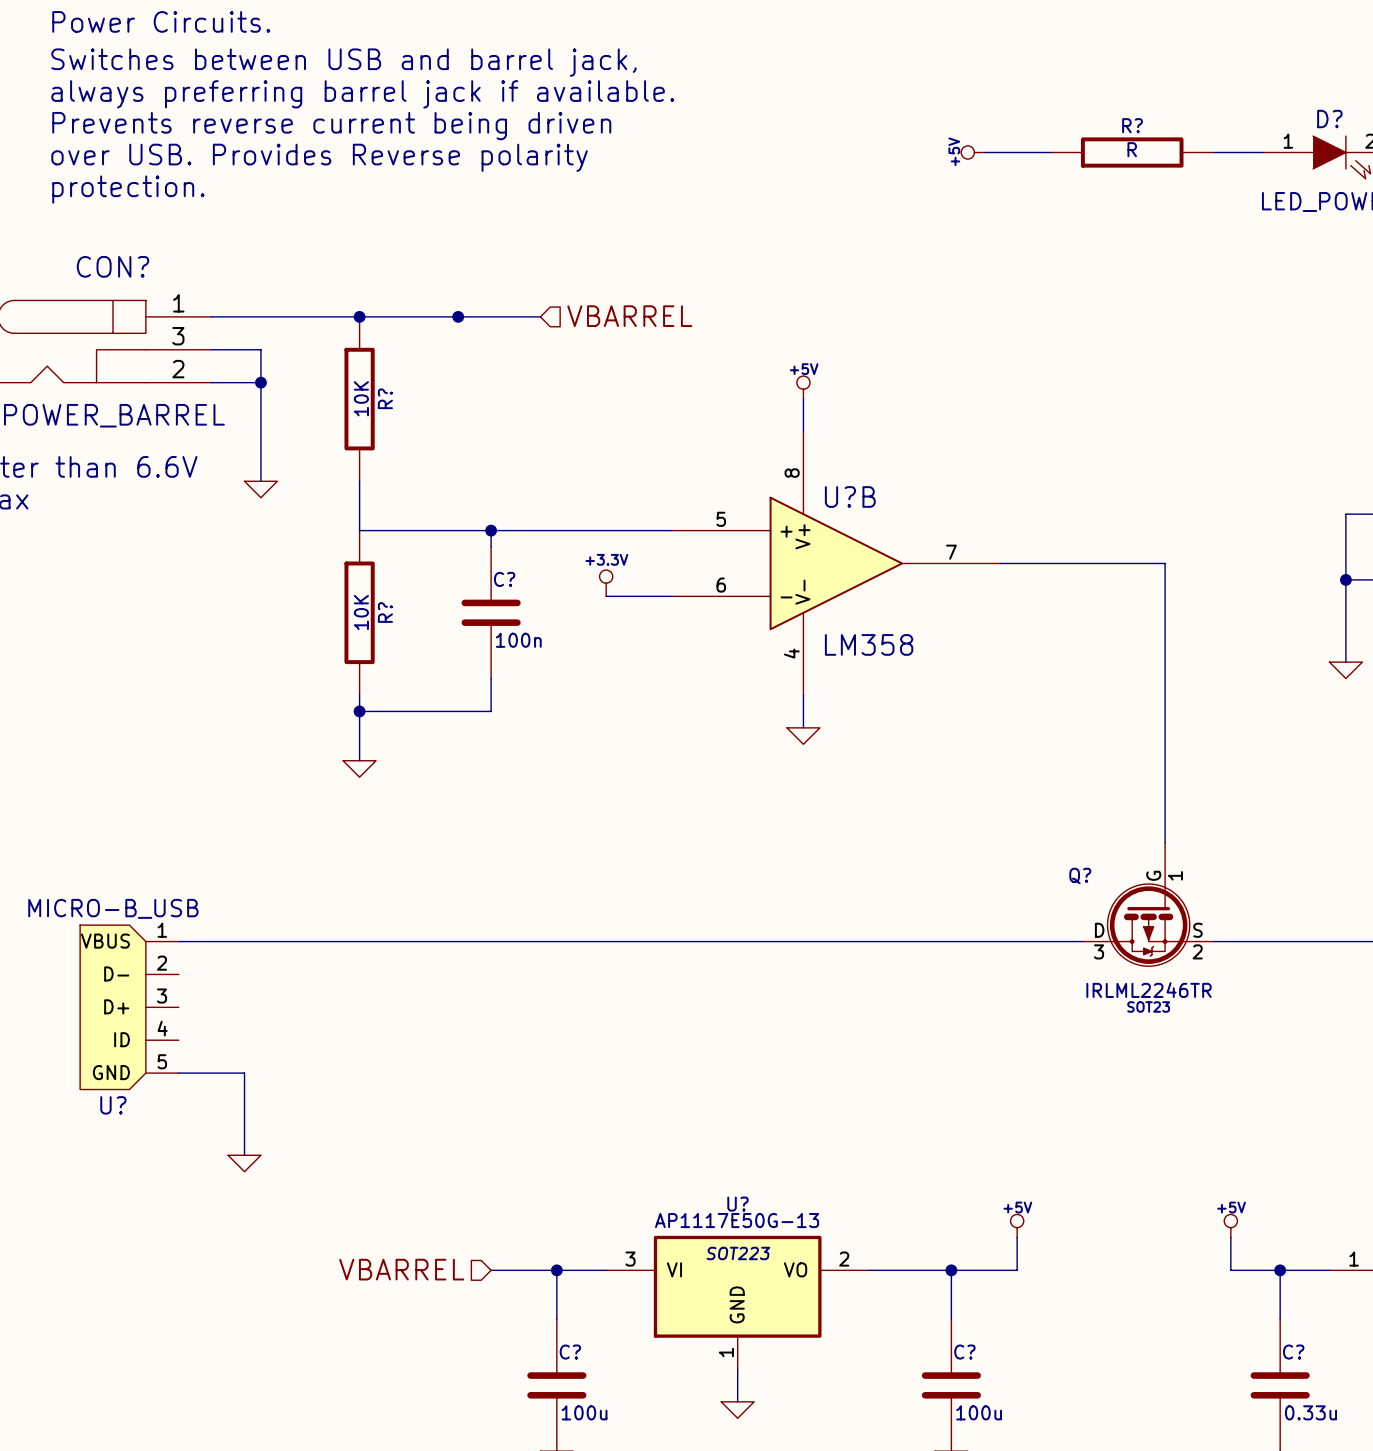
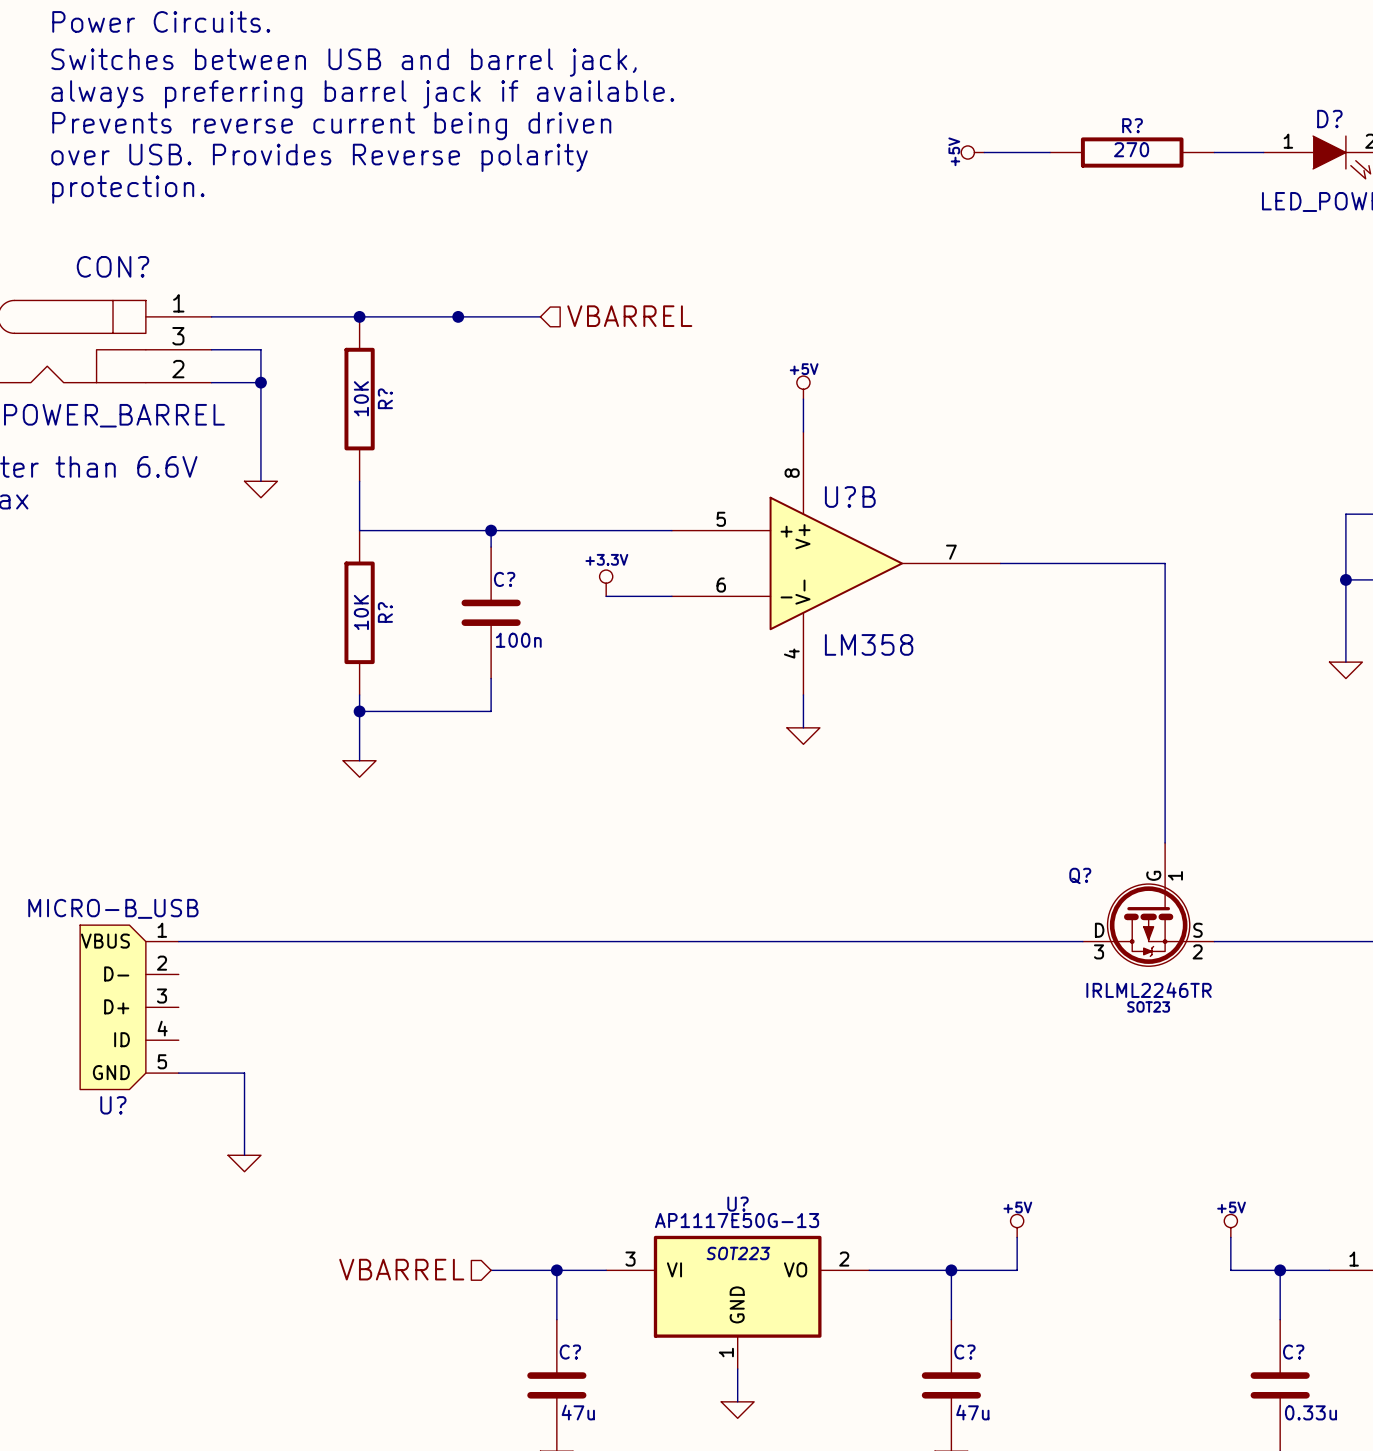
R? value: R (1132, 149) -> 270 (1131, 149)
C? value: 100u (584, 1412) -> 47u (578, 1412)
C? value: 100u (979, 1412) -> 47u (972, 1412)

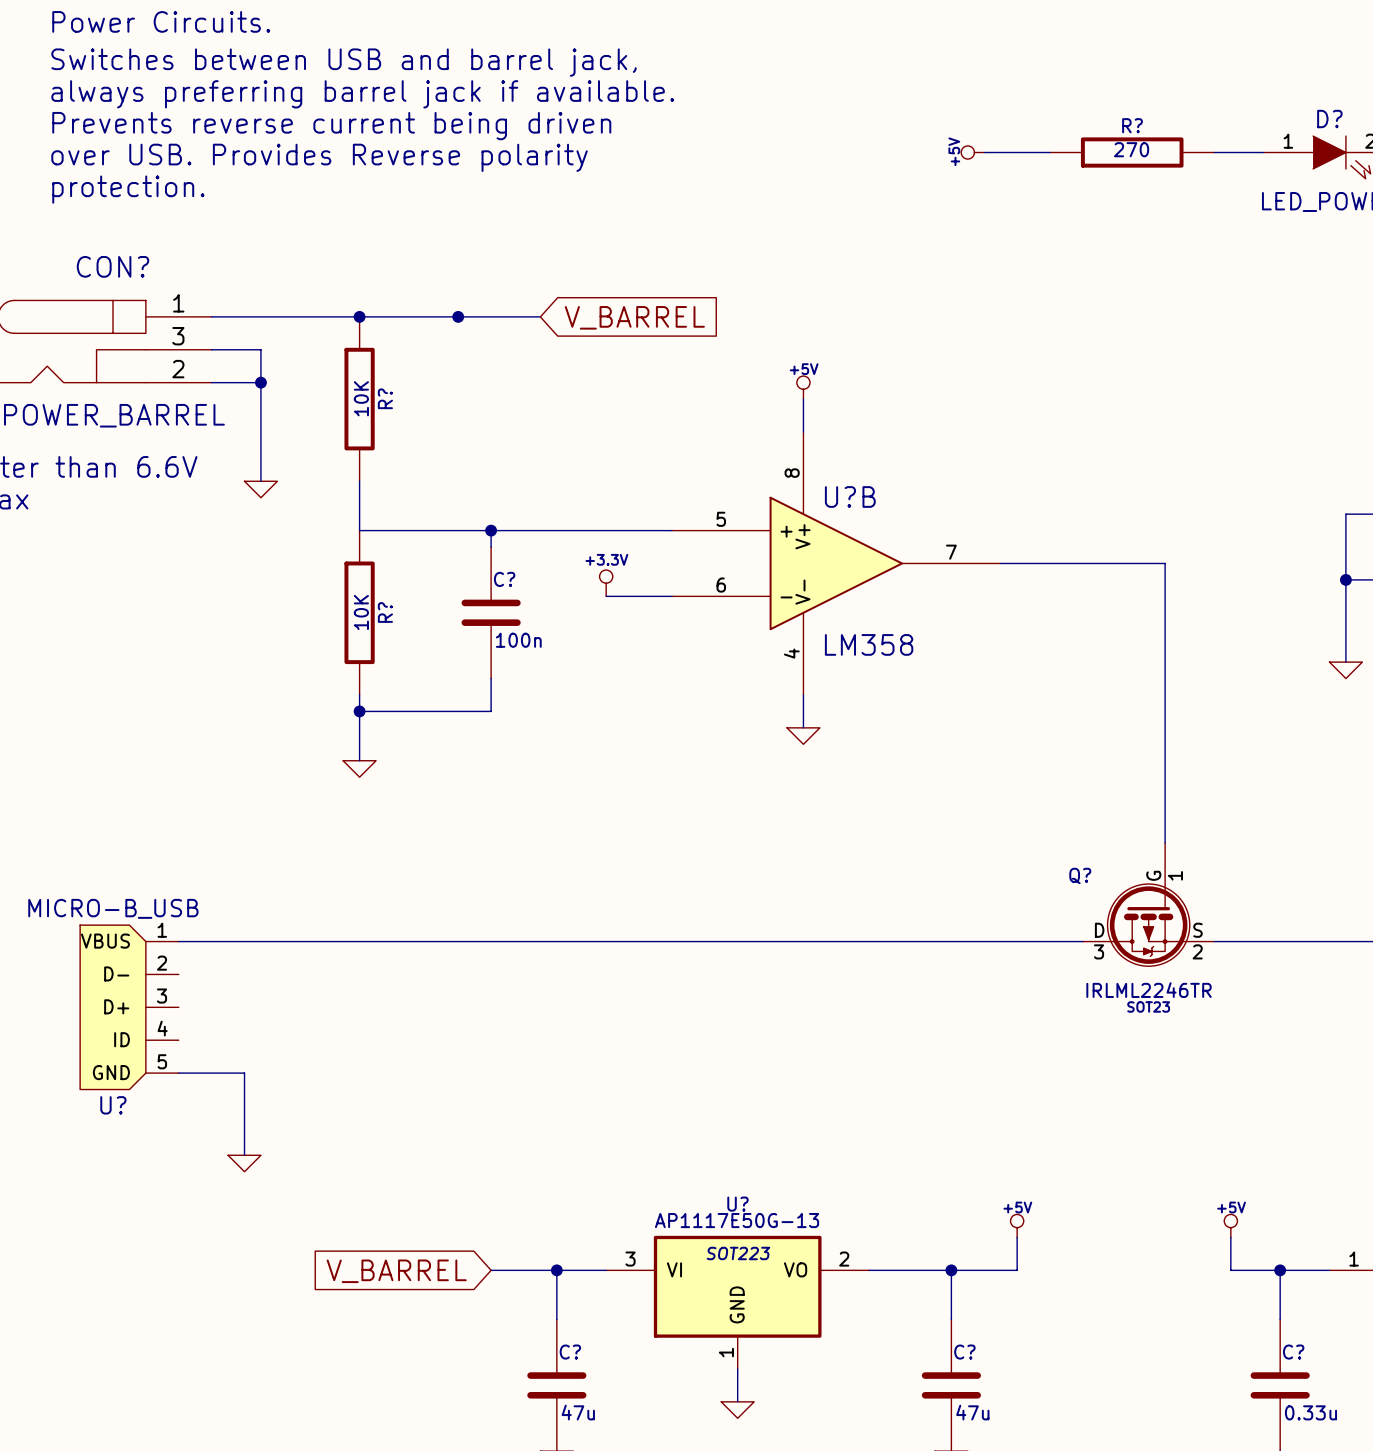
hierarchical label: VBARREL (629, 316) -> none
global label: none -> V_BARREL (634, 317)
hierarchical label: VBARREL (401, 1269) -> none
global label: none -> V_BARREL (396, 1271)

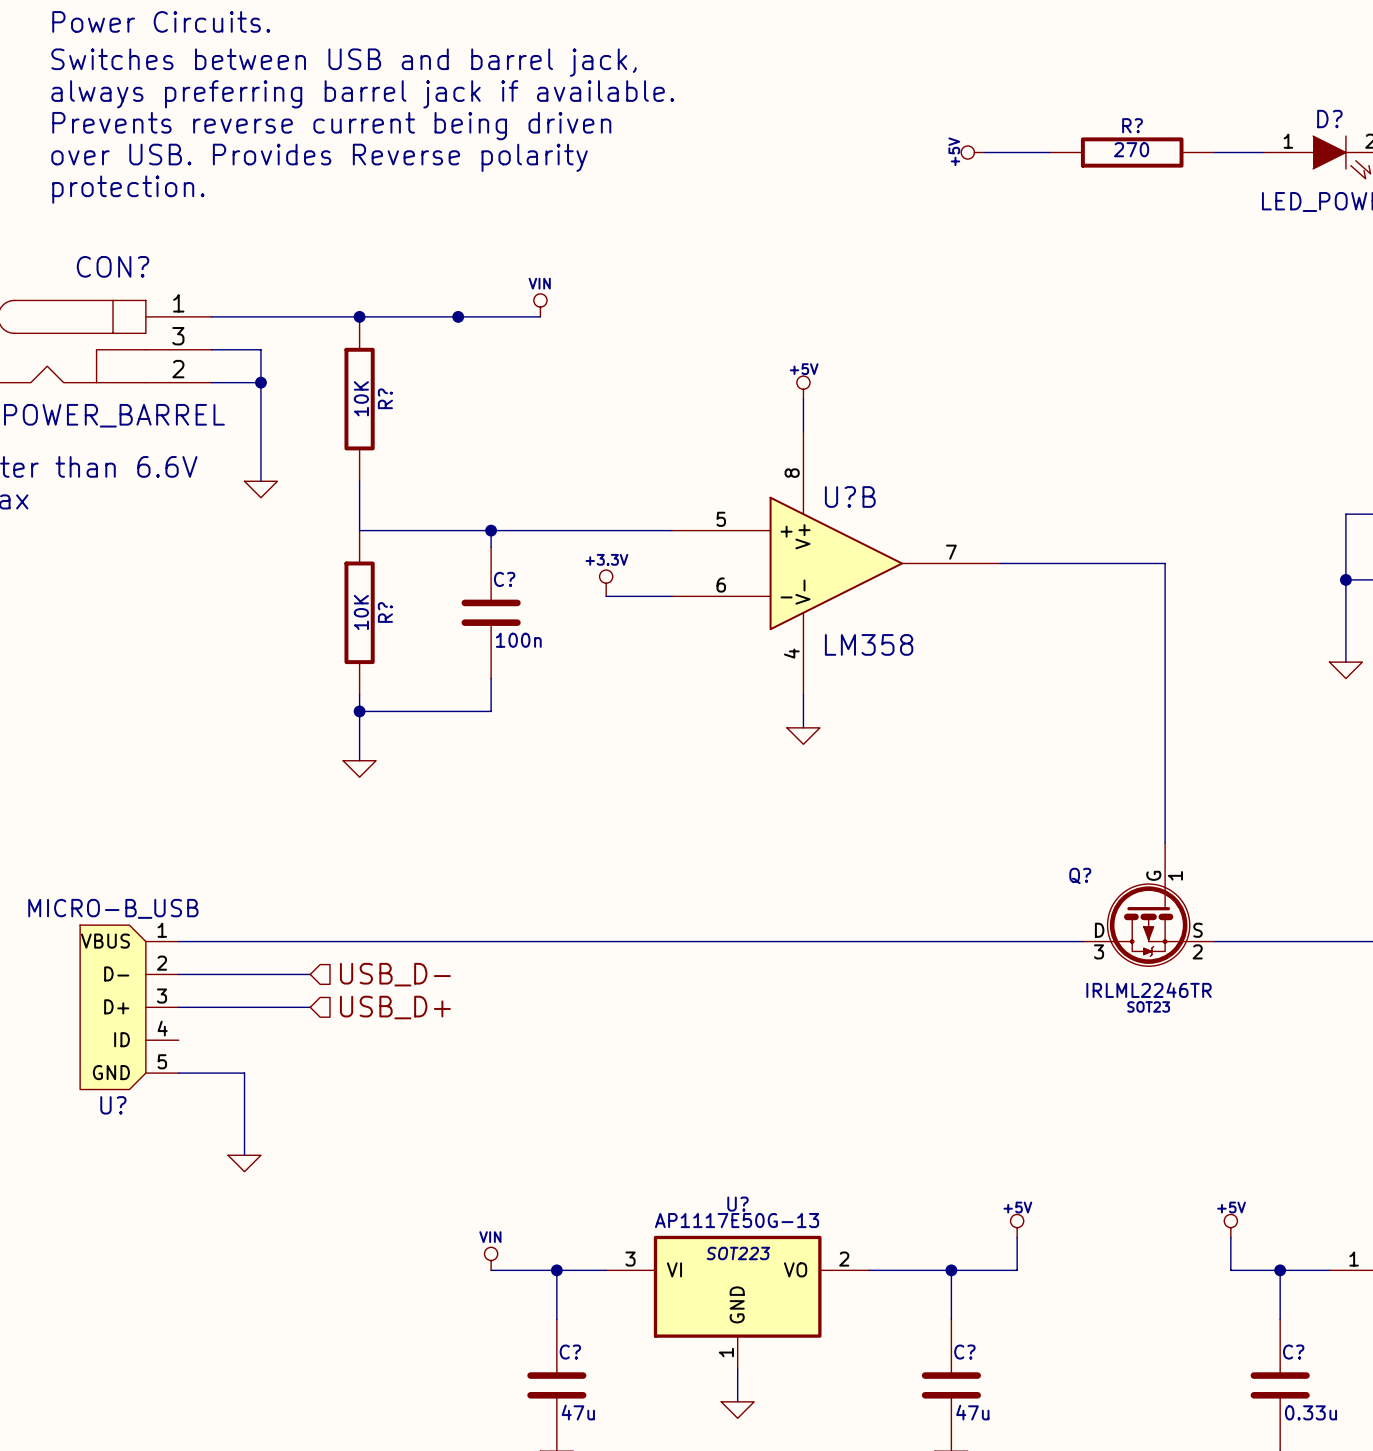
power symbol: none -> VIN (540, 305)
global label: V_BARREL (634, 317) -> none
wire: none -> (178, 974) (310, 974)
hierarchical label: none -> USB_D- (395, 974)
wire: none -> (178, 1007) (310, 1007)
hierarchical label: none -> USB_D+ (395, 1007)
power symbol: none -> VIN (491, 1258)
global label: V_BARREL (396, 1271) -> none

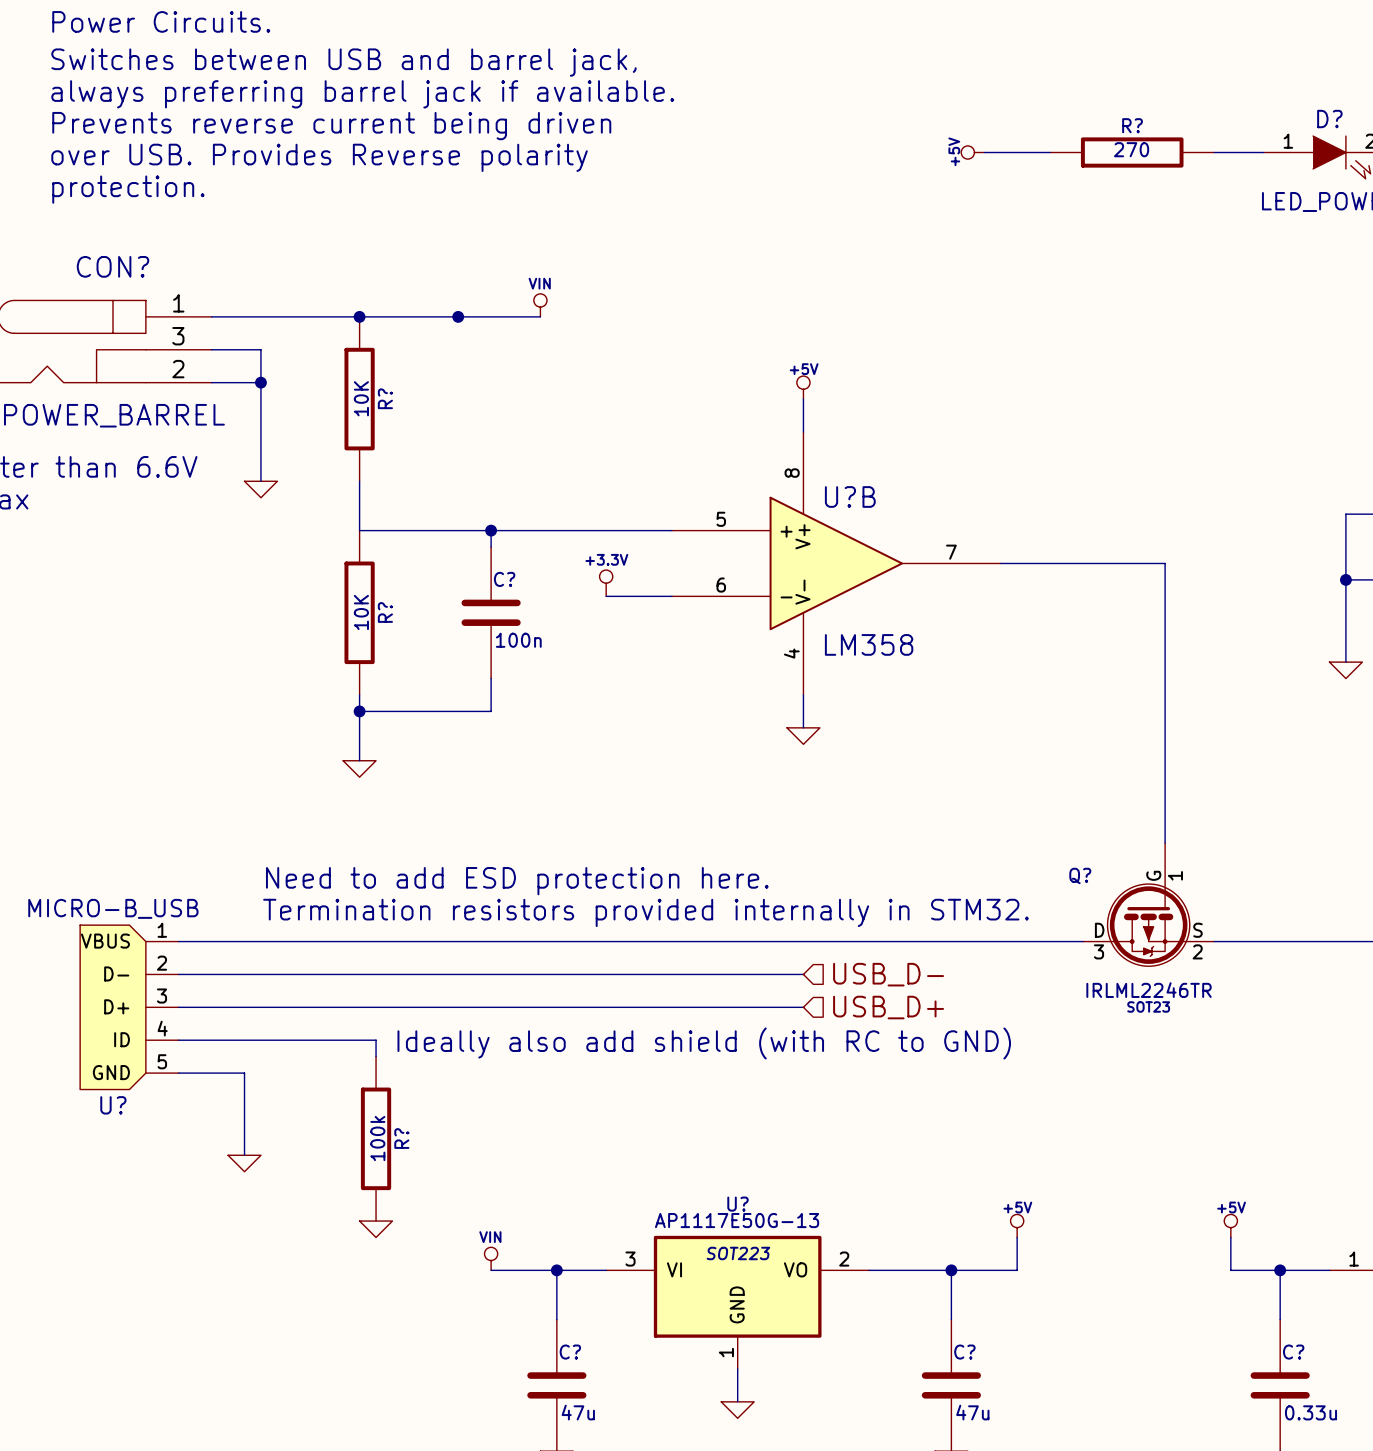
text: none -> Need to add ESD protection here. (517, 881)
text: none -> Termination resistors provided internally in STM32. (645, 912)
wire: none -> (310, 974) (803, 974)
hierarchical label: USB_D- (395, 974) -> none
hierarchical label: none -> USB_D- (888, 974)
wire: none -> (310, 1007) (803, 1007)
hierarchical label: USB_D+ (395, 1007) -> none
hierarchical label: none -> USB_D+ (888, 1007)
wire: none -> (178, 1040) (376, 1040) (376, 1056)
text: none -> Ideally also add shield (with RC to GND) (704, 1043)
R?: none -> 100k (376, 1138)
power symbol: none -> (376, 1229)

